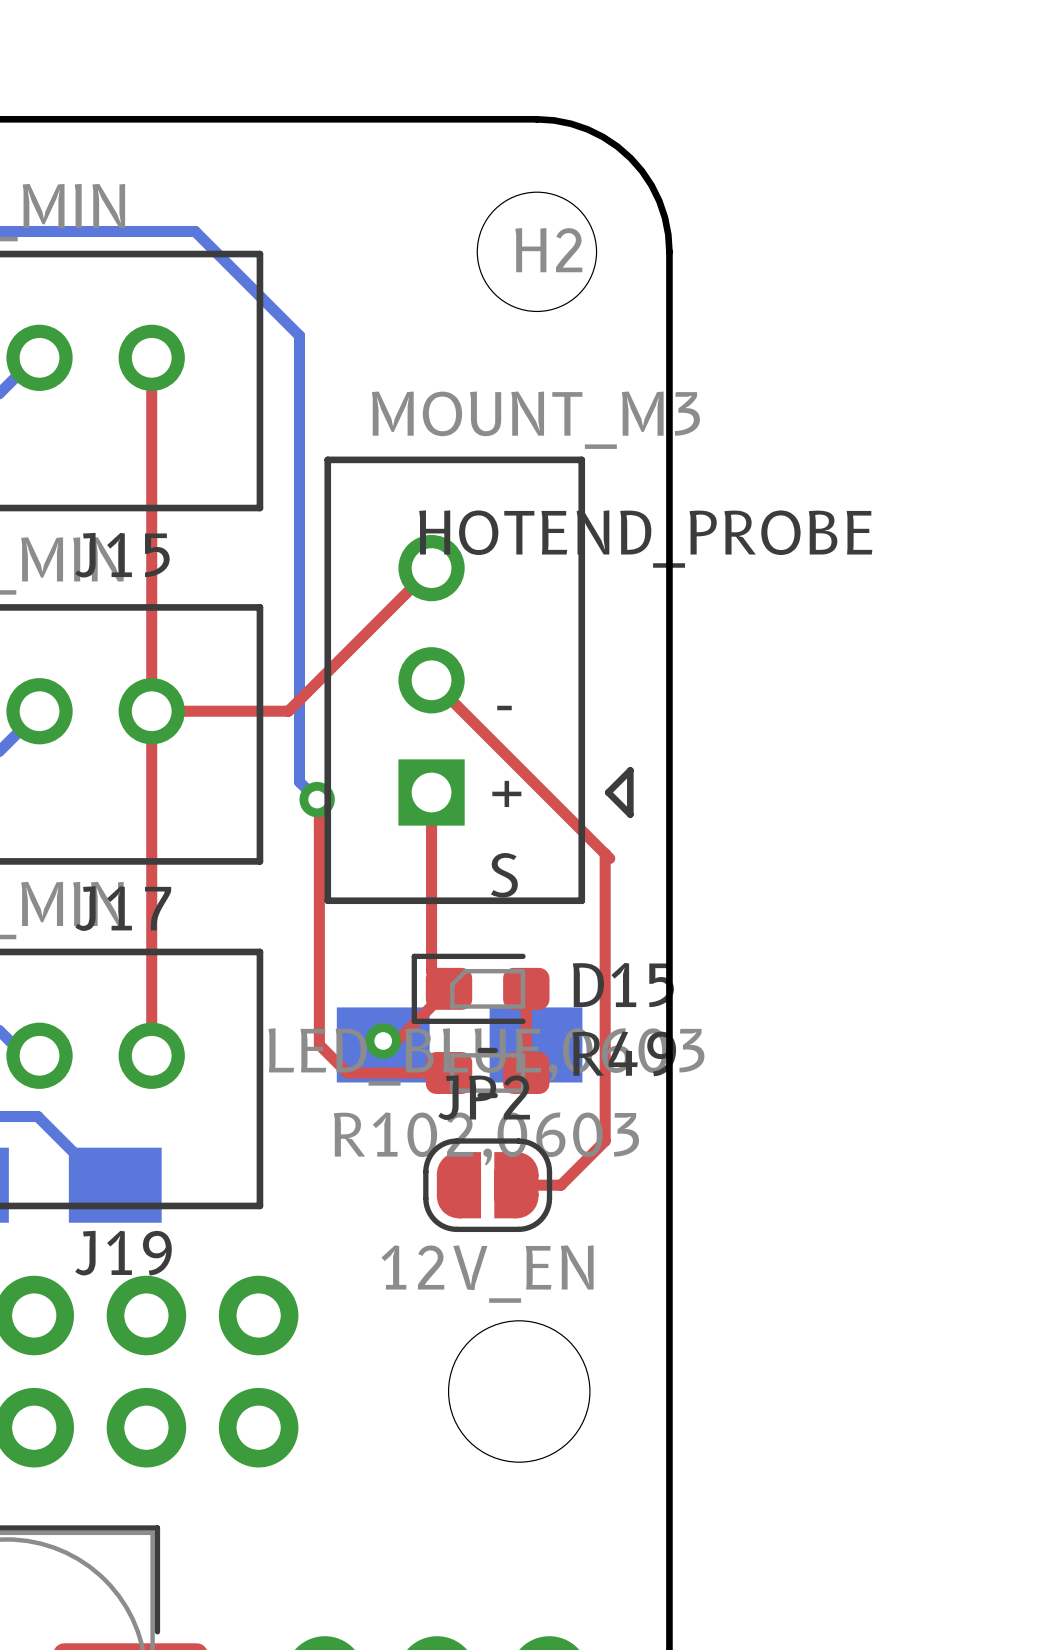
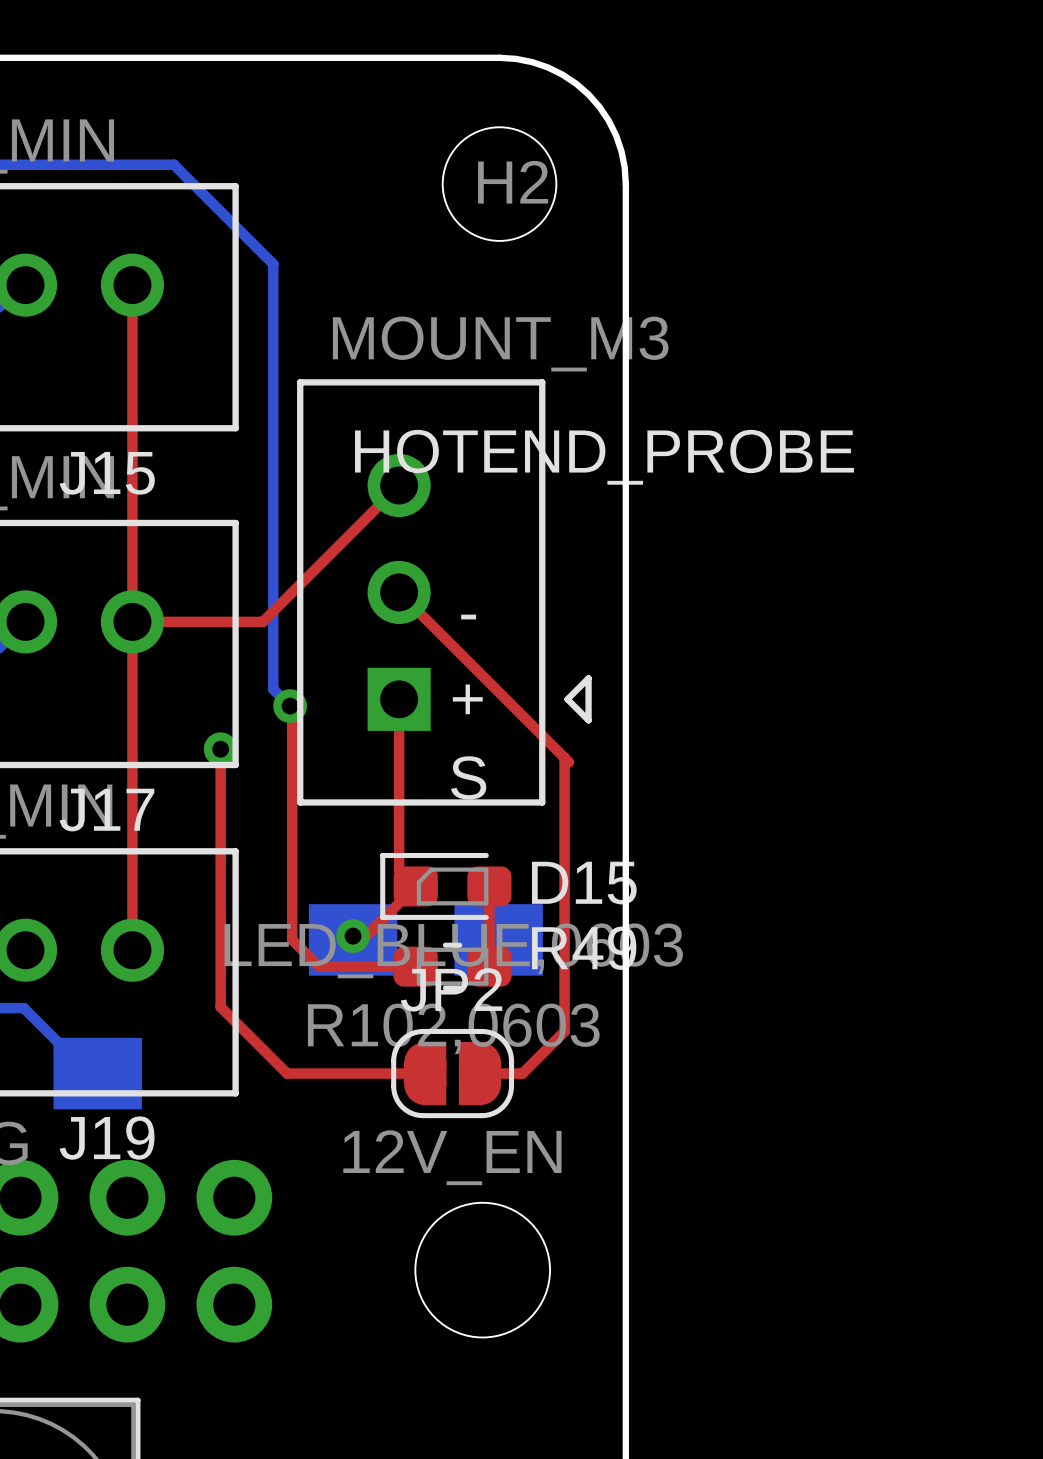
top track: none -> (220, 749) (220, 1007) (287, 1073) (425, 1073)
via: none -> (220, 749)

